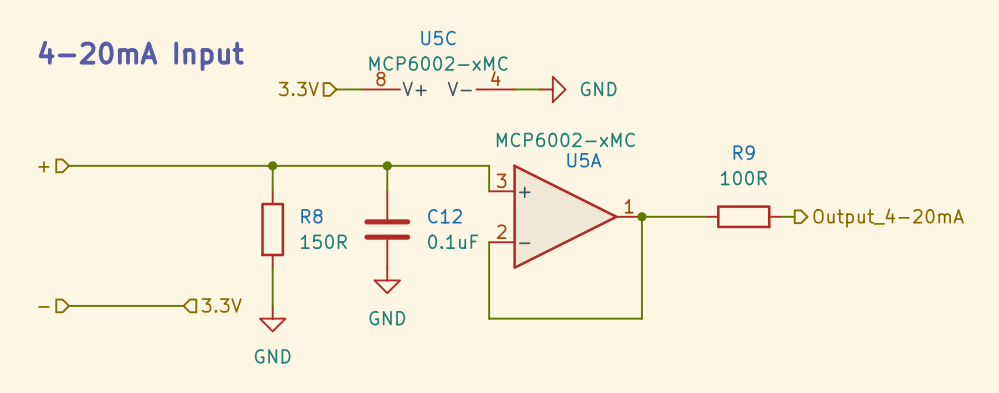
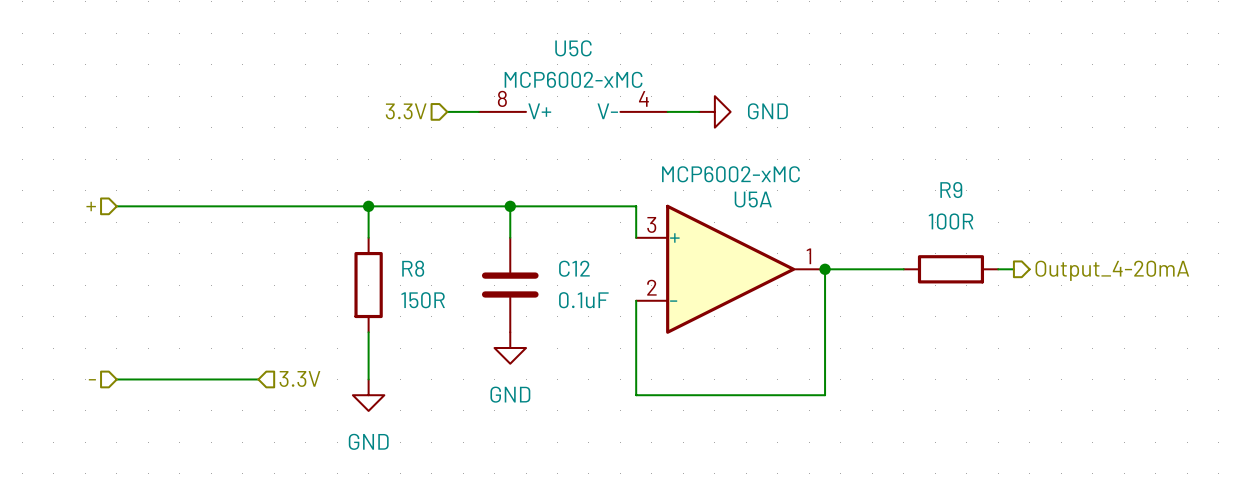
text: 4-20mA Input (141, 55) -> none

